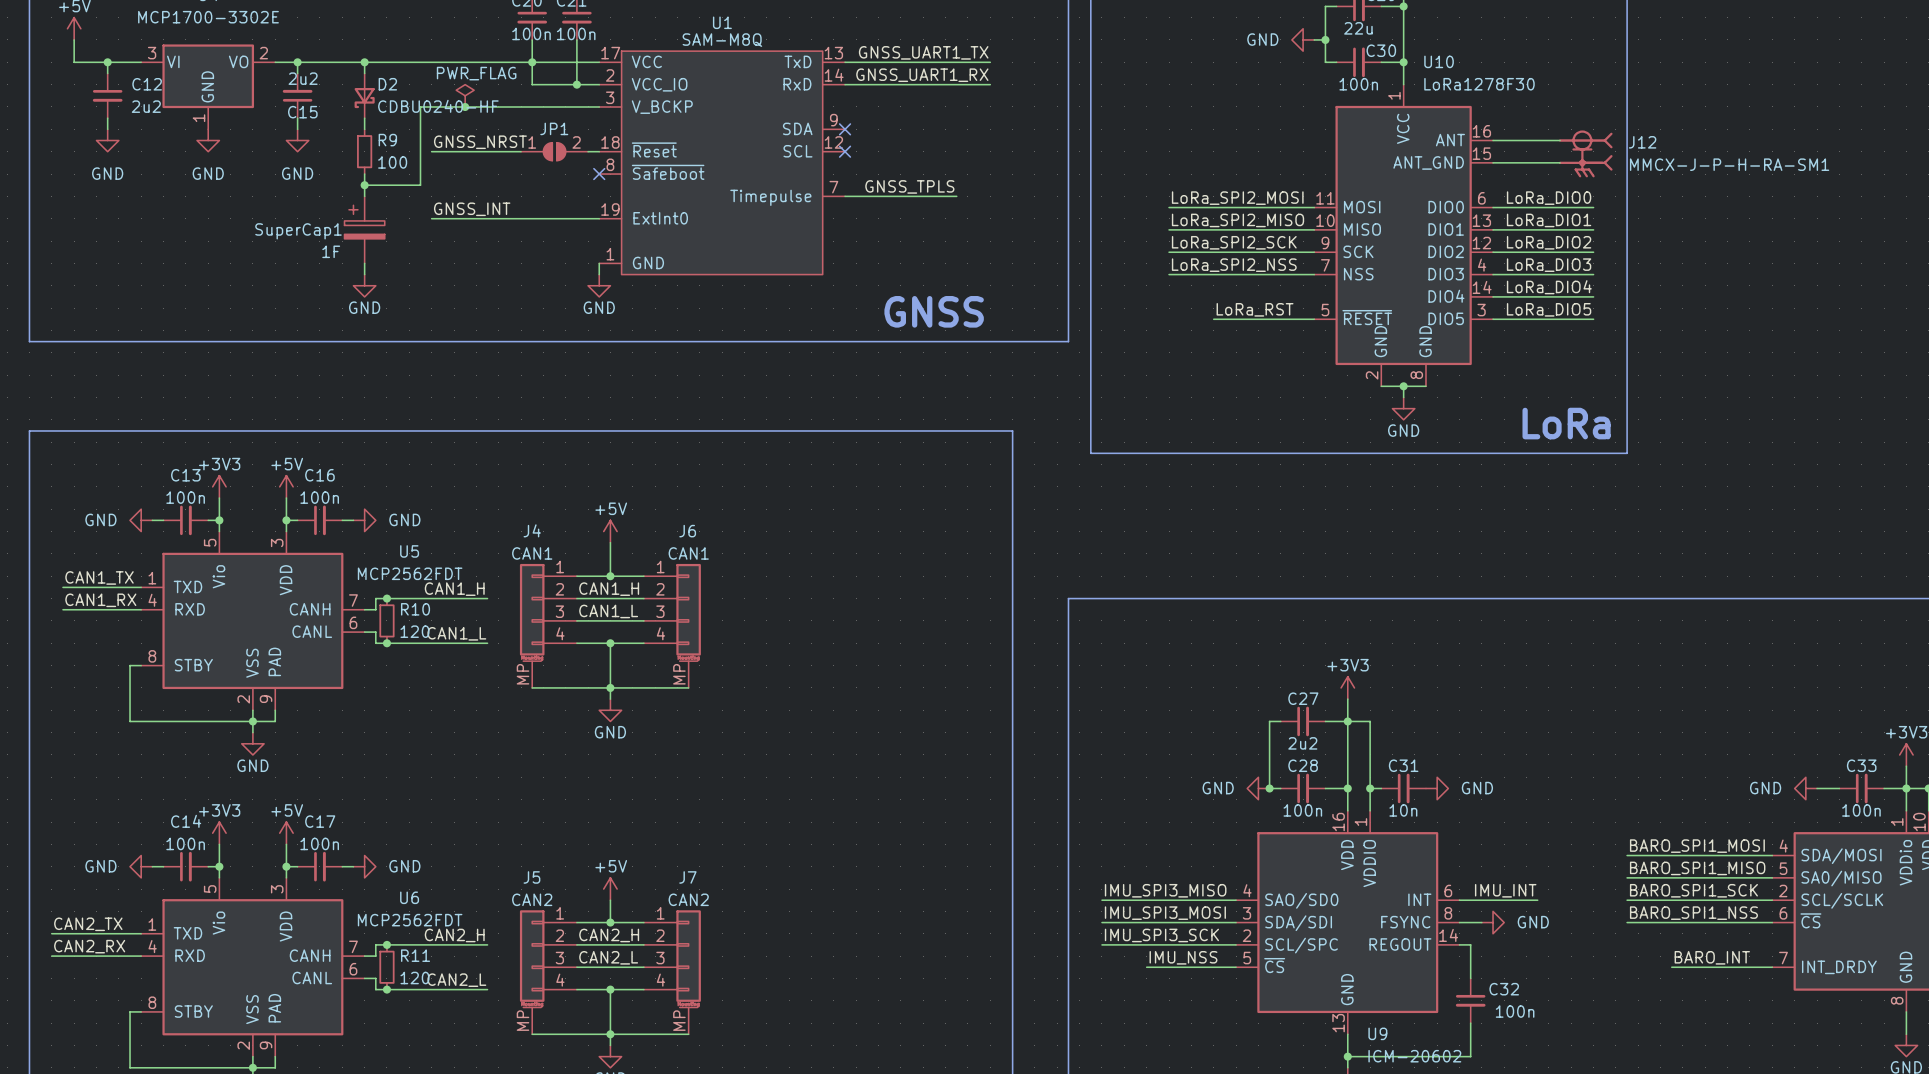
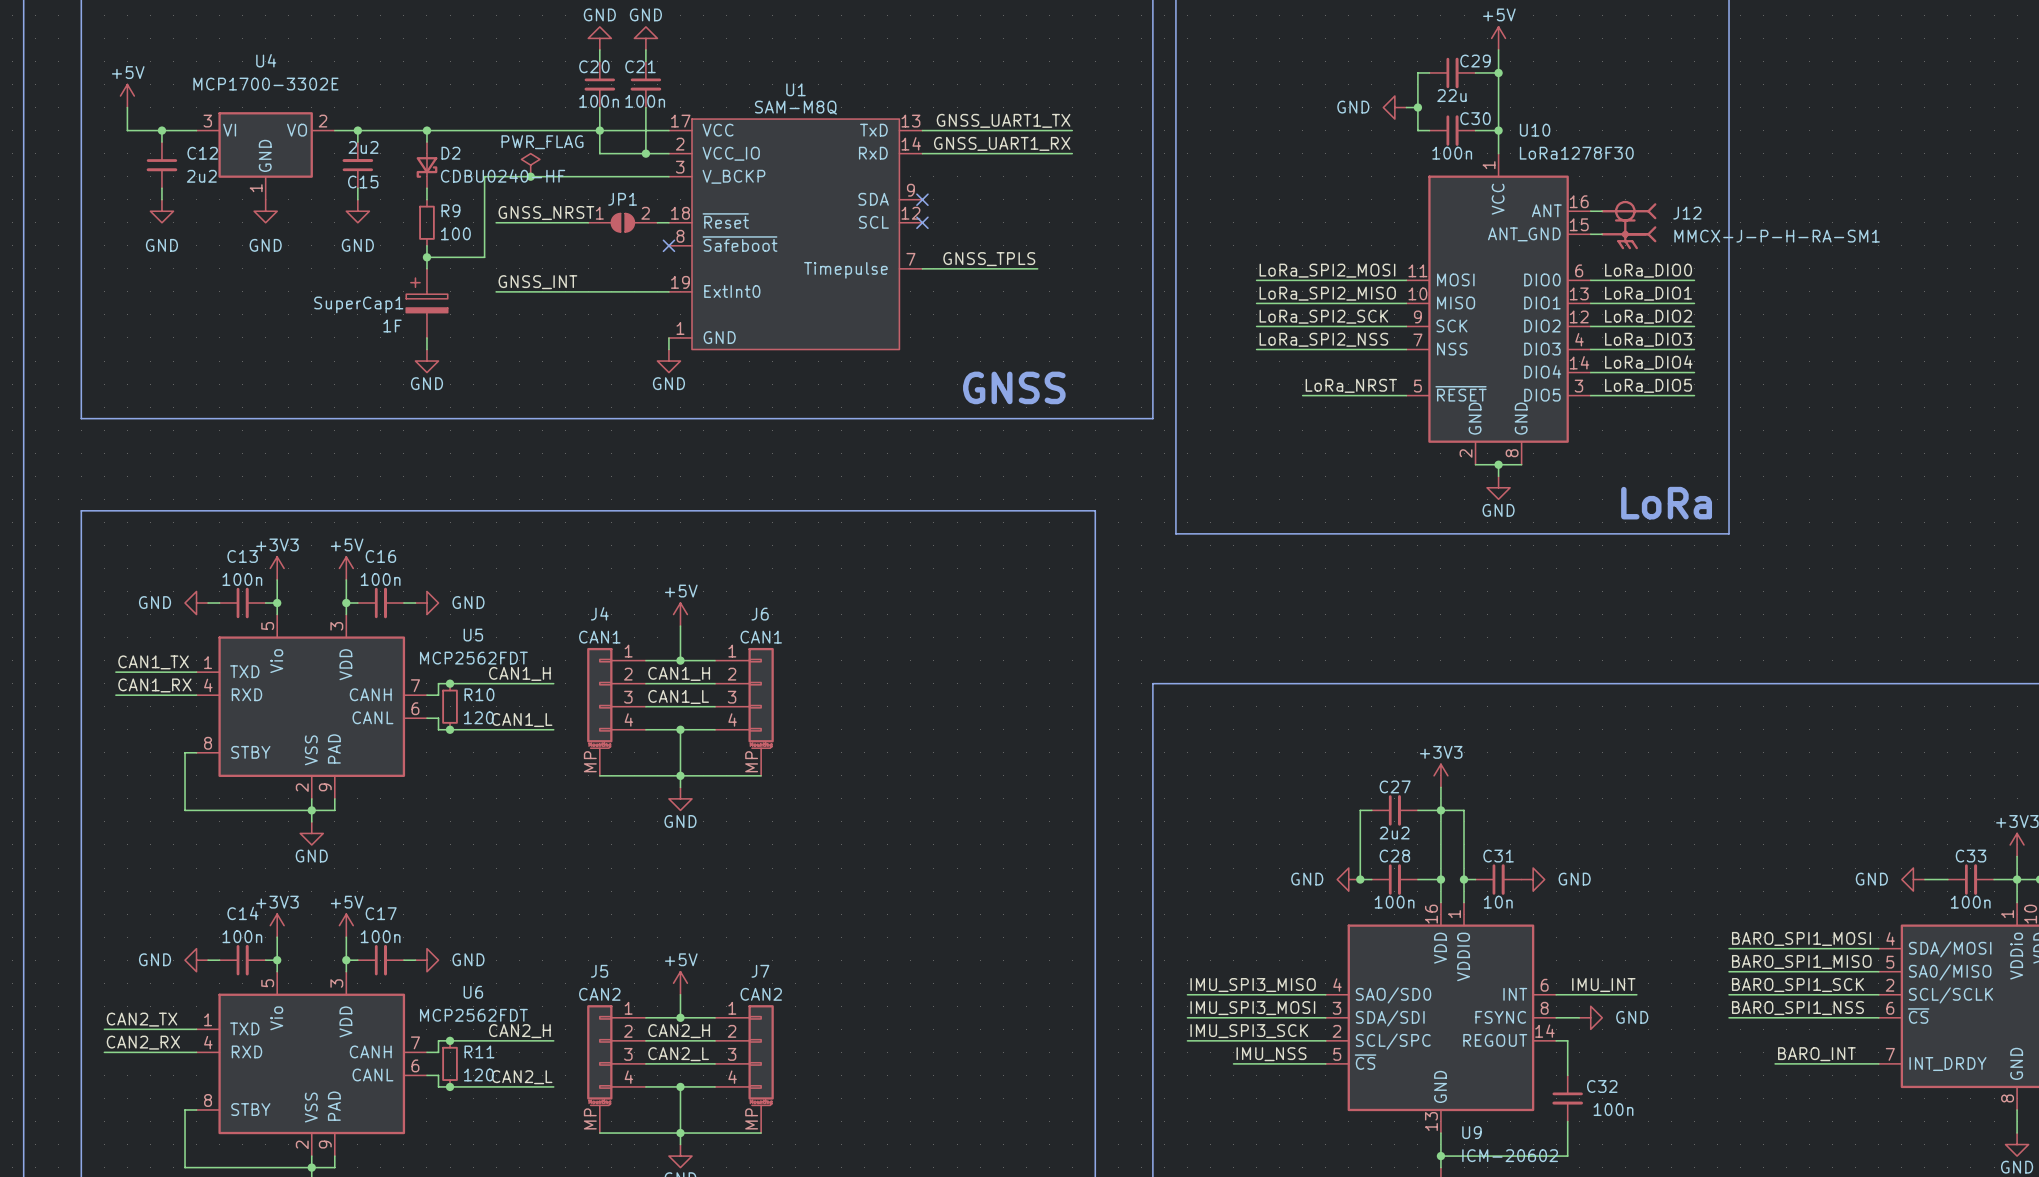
J12 position: (1585, 153) -> (1628, 225)
label: LoRa_RST (1255, 309) -> LoRa_NRST (1351, 385)

